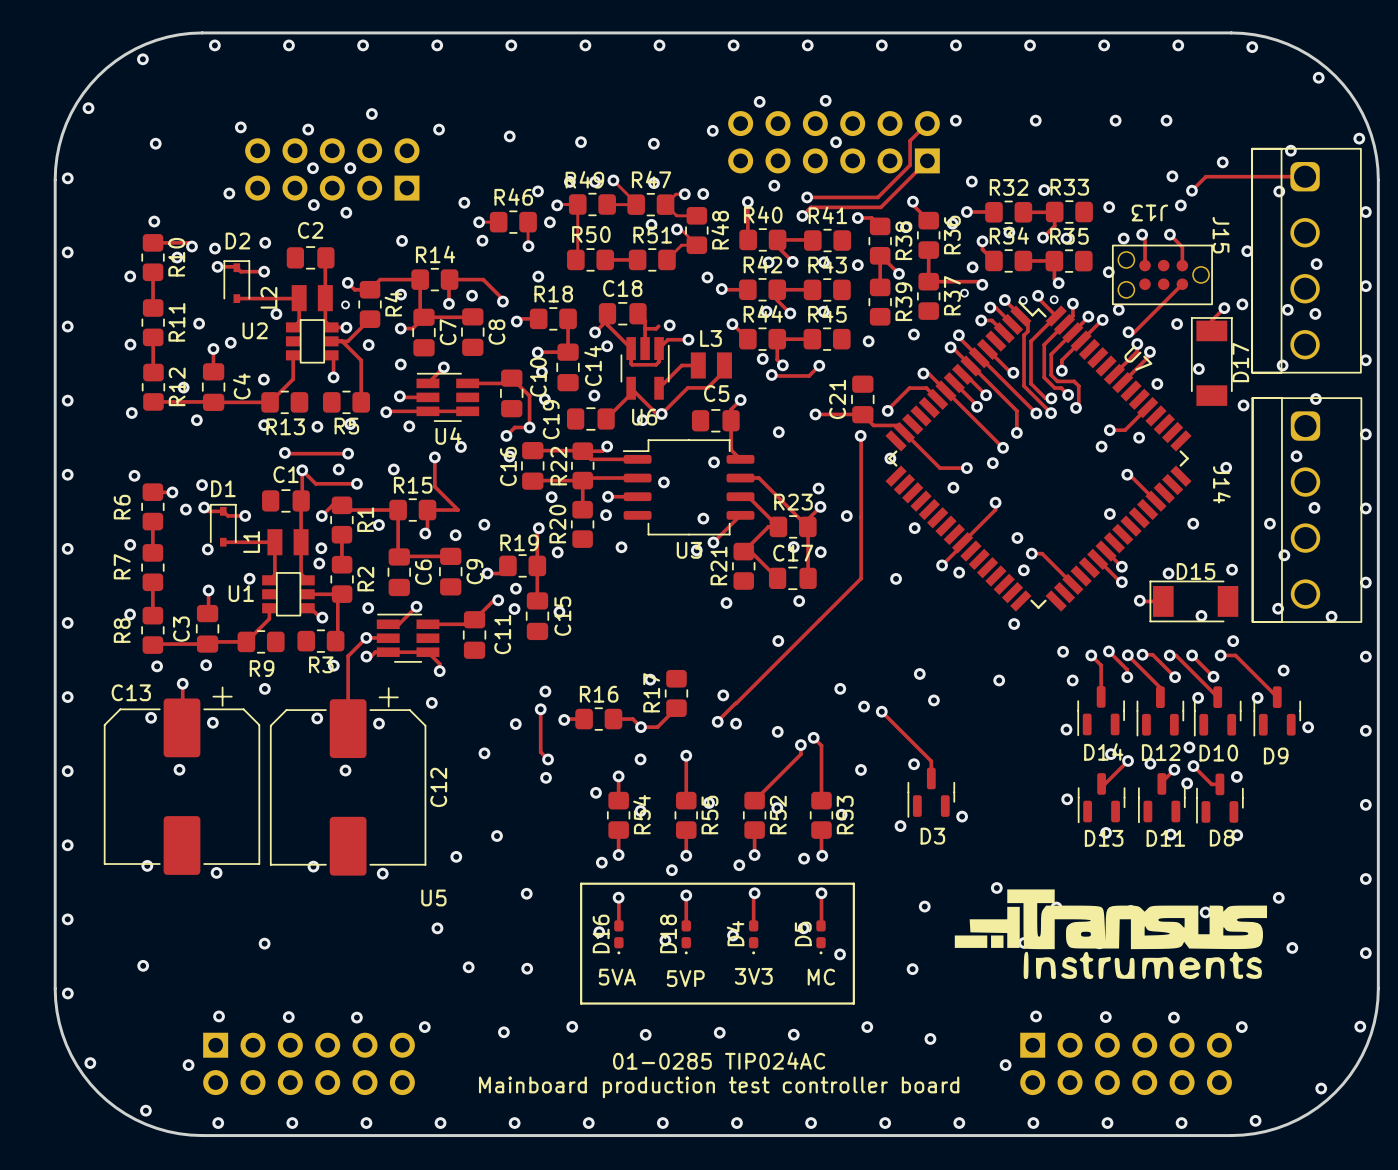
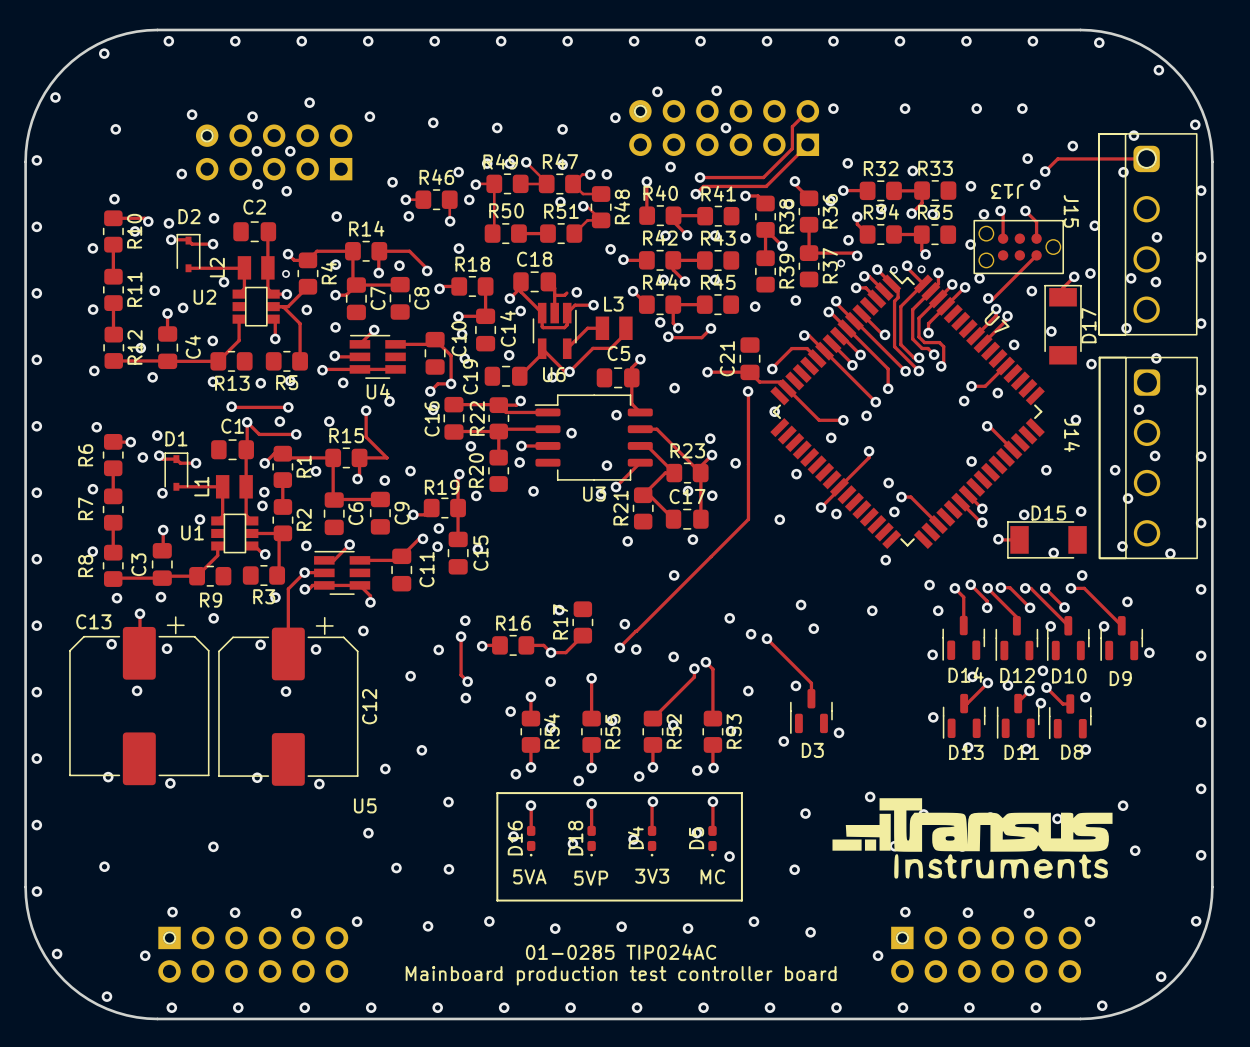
drawing: none -> [633, 104, 648, 119]
drawing: none -> [200, 129, 214, 143]
drawing: none -> [1136, 148, 1157, 169]
drawing: none -> [162, 931, 177, 945]
drawing: none -> [895, 931, 910, 945]

